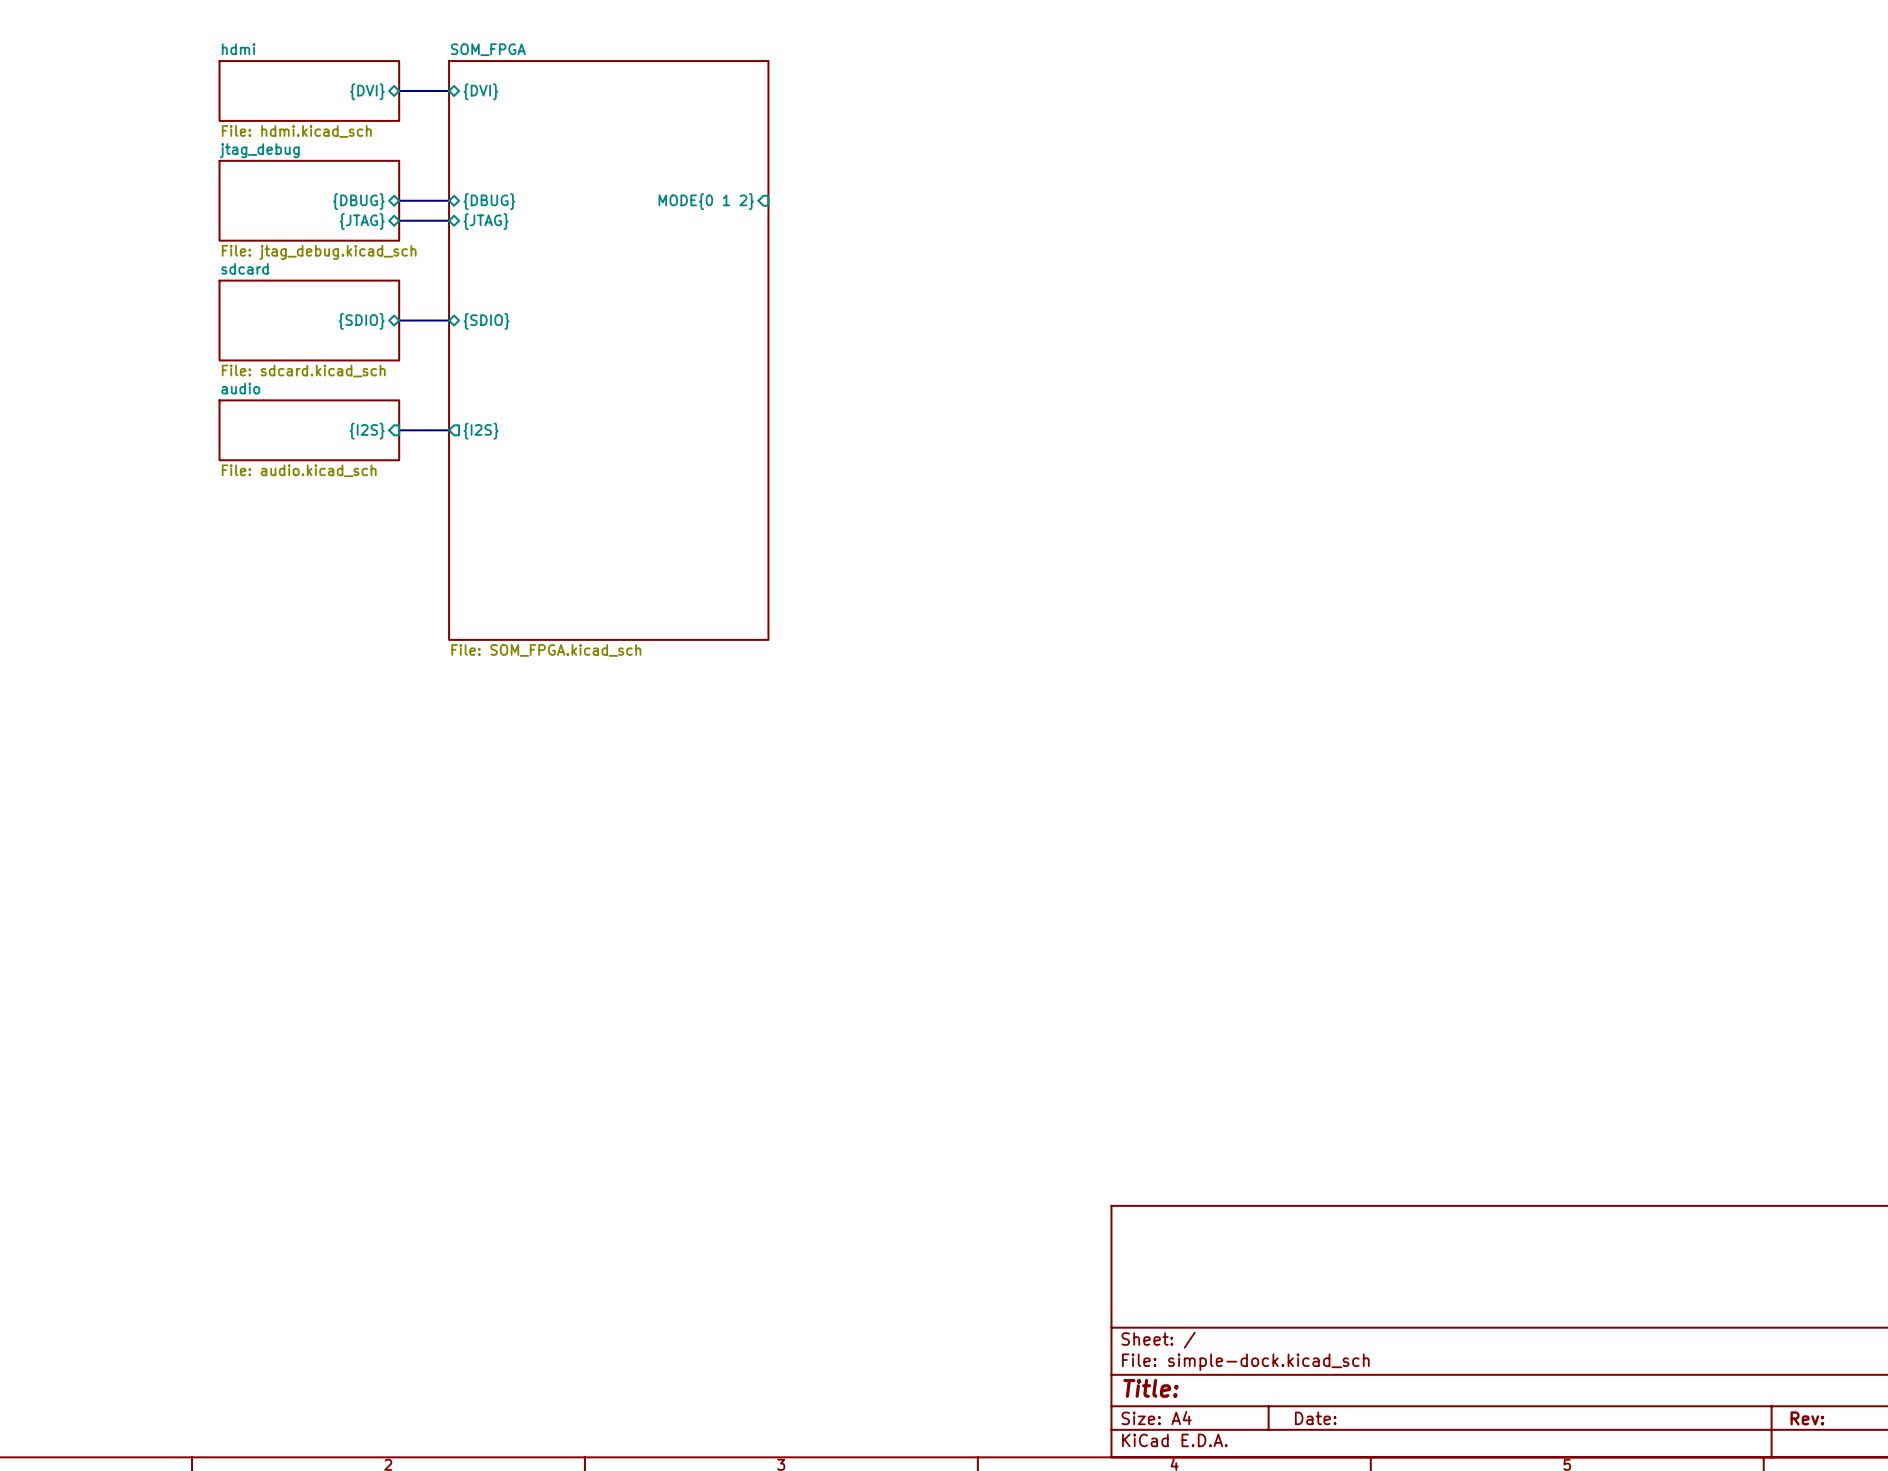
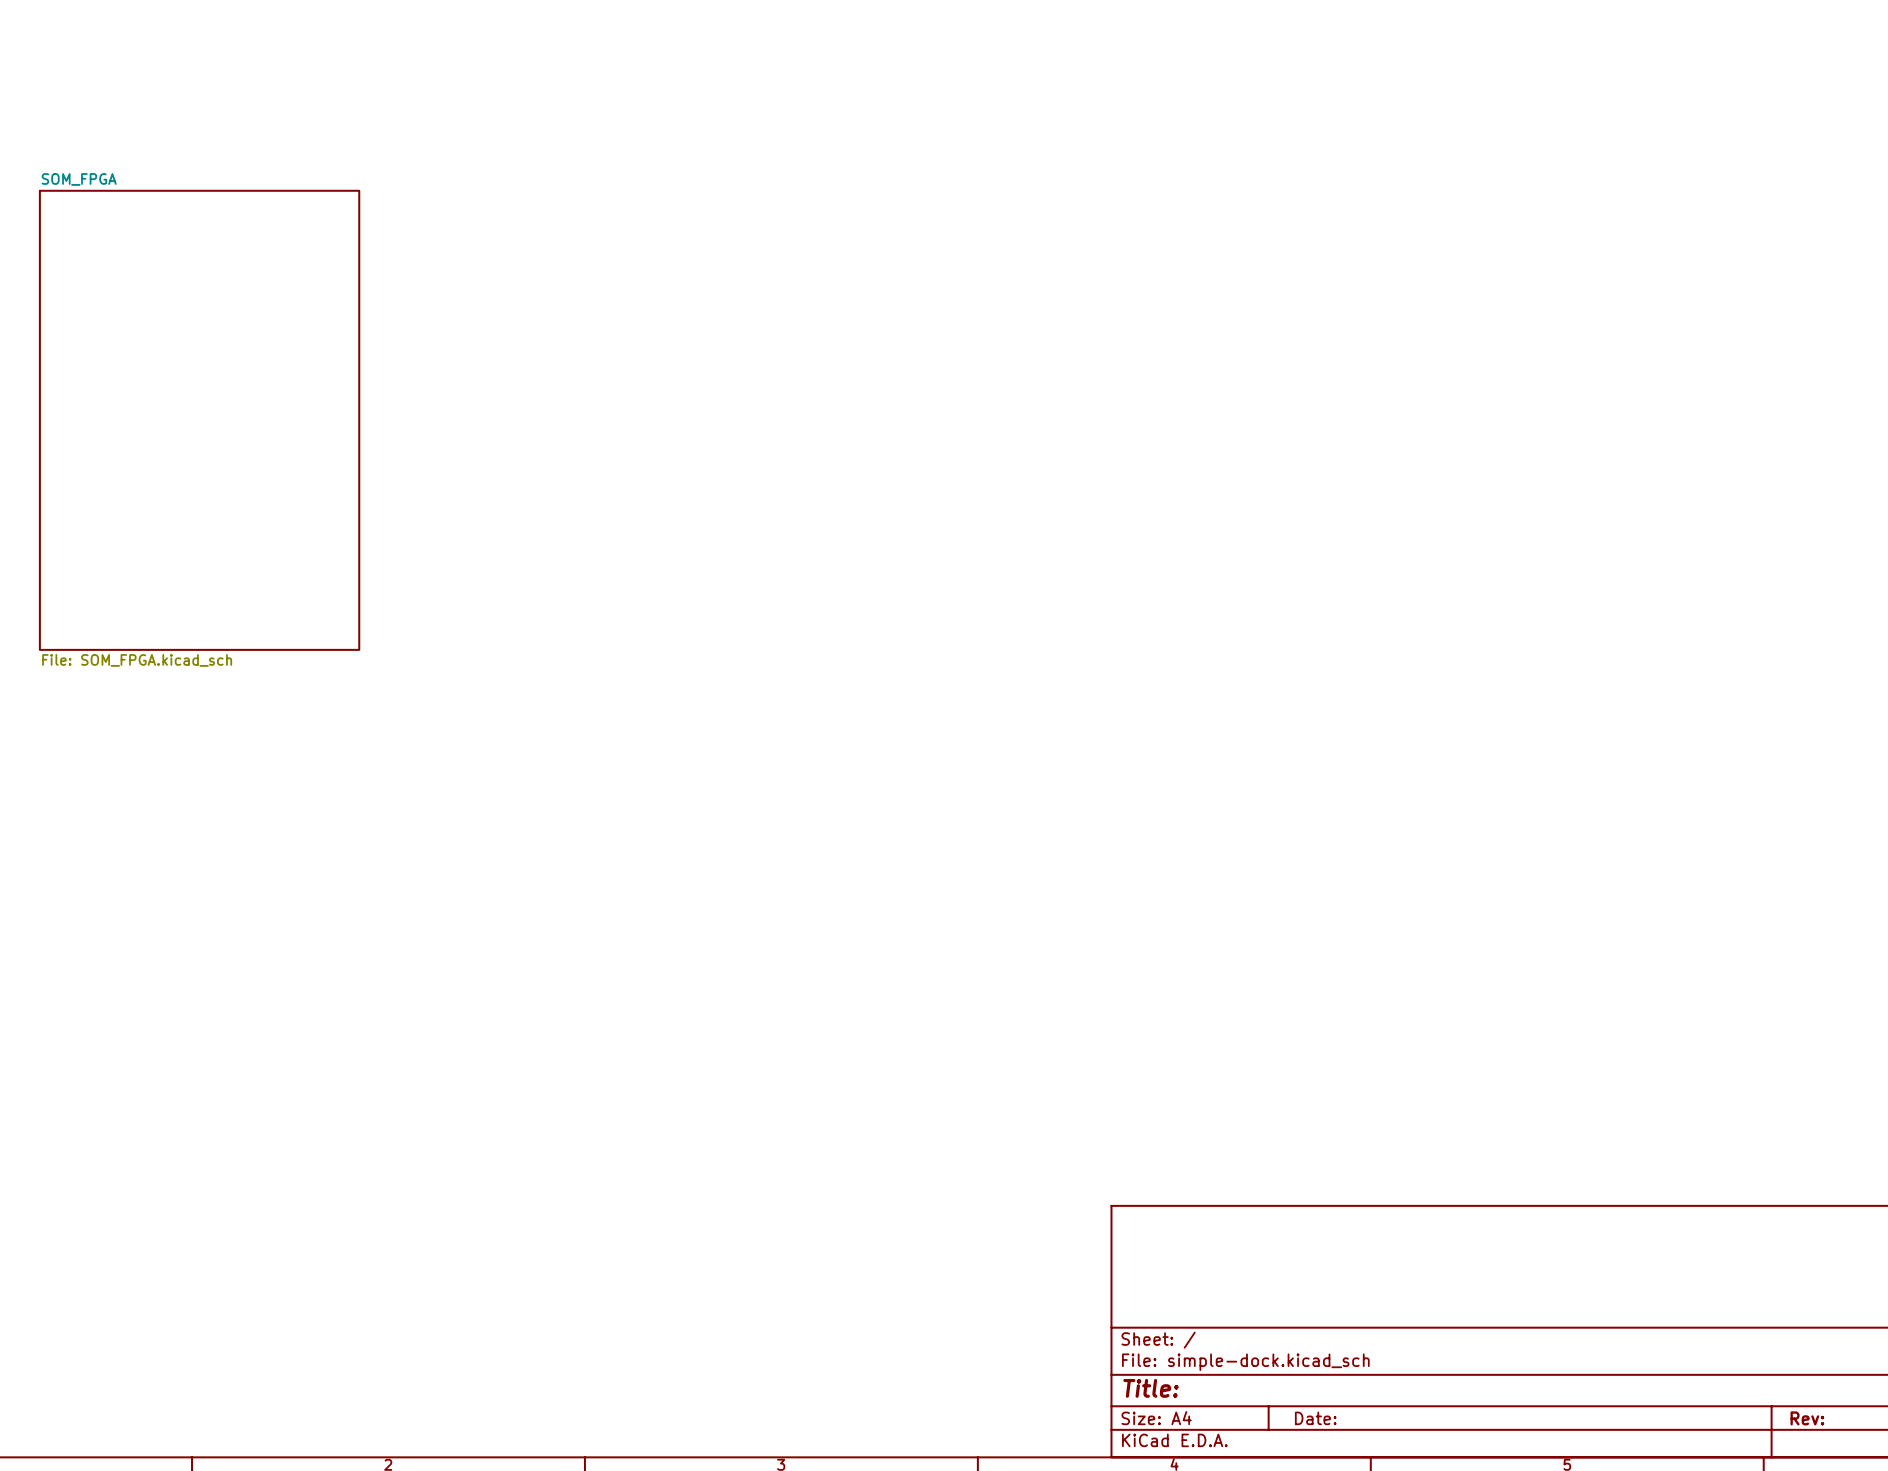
sheet hdmi: File: hdmi.kicad_sch (309, 90) -> none
bus: (399, 90) (449, 90) -> none
sheet pin: {DVI} (367, 91) -> none
sheet pin: {DVI} (480, 91) -> none
sheet jtag_debug: File: jtag_debug.kicad_sch (309, 200) -> none
bus: (399, 200) (449, 200) -> none
sheet pin: {DBUG} (358, 201) -> none
sheet pin: {DBUG} (489, 201) -> none
sheet pin: MODE{0 1 2} (706, 201) -> none
bus: (399, 220) (449, 220) -> none
sheet pin: {JTAG} (362, 221) -> none
sheet pin: {JTAG} (486, 221) -> none
sheet sdcard: File: sdcard.kicad_sch (309, 320) -> none
bus: (399, 320) (449, 320) -> none
sheet pin: {SDIO} (361, 321) -> none
sheet pin: {SDIO} (486, 321) -> none
sheet SOM_FPGA: File: SOM_FPGA.kicad_sch (608, 350) -> none
sheet SOM_FPGA: none -> File: SOM_FPGA.kicad_sch (199, 420)
sheet audio: File: audio.kicad_sch (309, 430) -> none
bus: (399, 430) (449, 430) -> none
sheet pin: {I2S} (367, 431) -> none
sheet pin: {I2S} (481, 431) -> none

